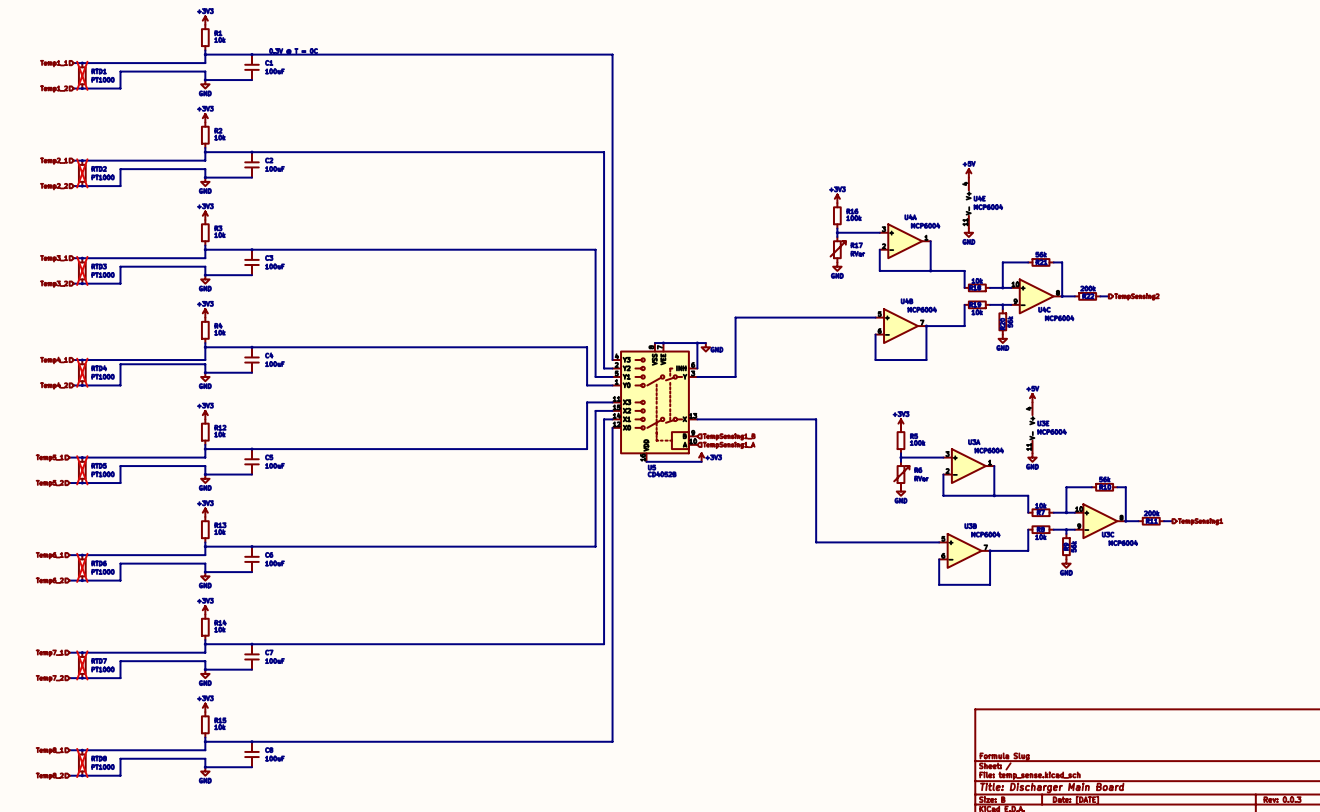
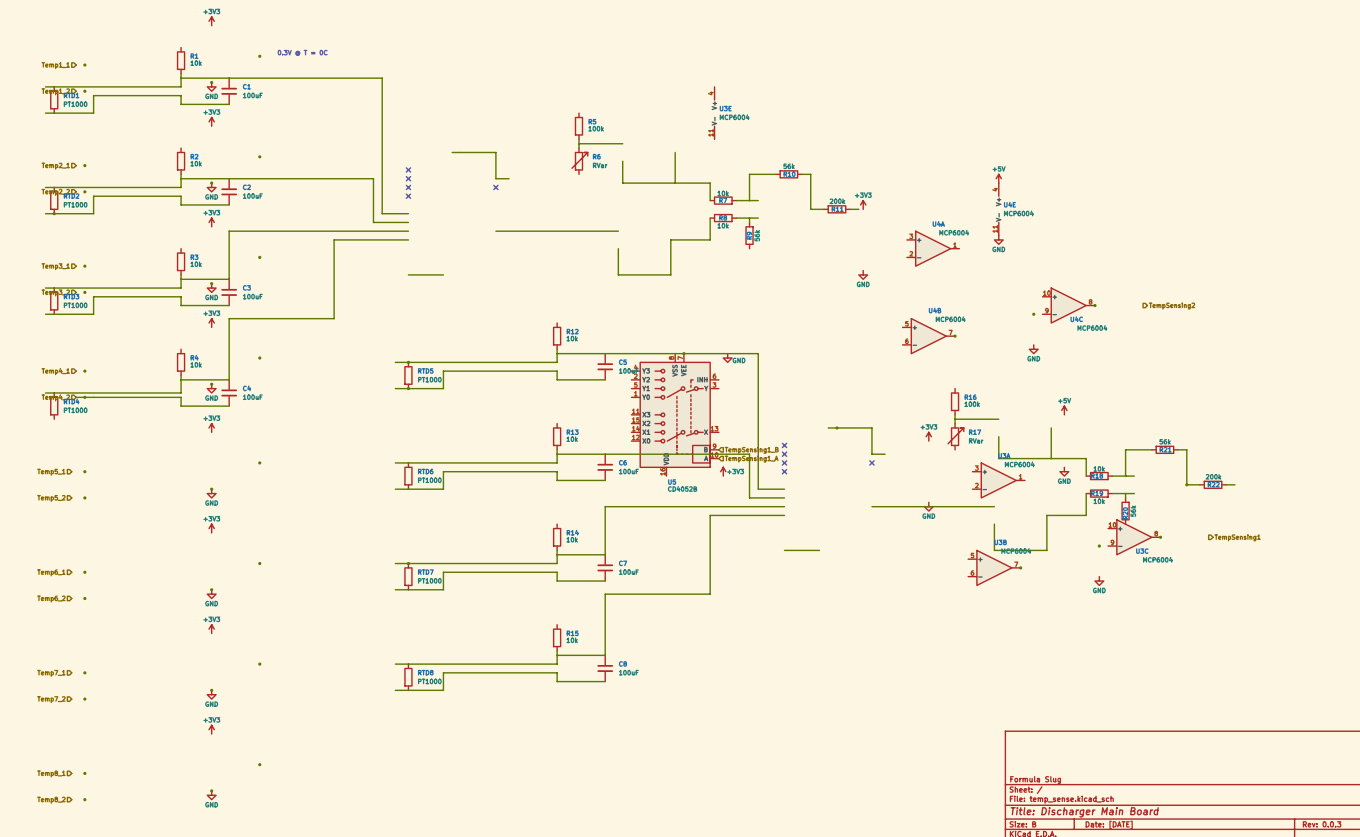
part position: (205, 37) -> (181, 60)
wire: (205, 50) (205, 63) (73, 63) -> (181, 73) (181, 86) (45, 86)
wire: (205, 54) (612, 54) (612, 360) -> none
part position: (251, 67) -> (229, 91)
part position: (82, 75) -> (54, 100)
part do-not-place cross: (82, 75) -> none
wire: none -> (181, 78) (382, 78) (382, 213) (408, 213)
wire: (251, 80) (205, 80) (205, 71) (120, 71) (120, 88) (73, 88) -> (229, 104) (181, 104) (181, 95) (93, 95) (93, 113) (45, 113)
part position: (205, 135) -> (181, 161)
wire: none -> (578, 139) (578, 148)
wire: none -> (578, 143) (622, 143)
wire: (205, 147) (205, 160) (73, 160) -> (181, 174) (181, 187) (45, 187)
wire: none -> (452, 152) (495, 152) (495, 178) (509, 178)
wire: none -> (675, 152) (675, 183)
wire: (205, 152) (604, 152) (604, 156) -> none
part position: (251, 164) -> (229, 191)
no-connect mark: none -> (408, 169)
wire: none -> (775, 174) (749, 174) (749, 200)
wire: none -> (802, 174) (810, 174) (810, 209) (823, 209)
part position: (82, 173) -> (54, 200)
part do-not-place cross: (82, 173) -> none
wire: none -> (181, 178) (373, 178) (373, 222) (408, 222)
no-connect mark: none -> (408, 178)
wire: (251, 177) (205, 177) (205, 169) (120, 169) (120, 186) (73, 186) -> (229, 204) (181, 204) (181, 196) (93, 196) (93, 213) (45, 213)
wire: (604, 177) (604, 368) (612, 368) -> (622, 183) (710, 183) (710, 200)
no-connect mark: none -> (408, 187)
no-connect mark: none -> (495, 187)
no-connect mark: none -> (408, 196)
wire: none -> (736, 200) (758, 200)
wire: none -> (850, 209) (858, 209)
junction: none -> (54, 213)
wire: none -> (710, 218) (710, 239) (670, 239) (670, 274) (618, 274) (618, 248)
wire: none -> (736, 218) (758, 218)
wire: none -> (749, 218) (749, 222)
part position: (837, 215) -> (955, 401)
wire: none -> (408, 231) (229, 231) (229, 279) (181, 279)
wire: none -> (495, 231) (618, 231)
wire: (837, 228) (837, 236) -> none
part position: (205, 232) -> (181, 261)
wire: none -> (408, 239) (334, 239) (334, 318) (229, 318) (229, 379) (181, 379)
wire: (837, 232) (879, 232) -> none
wire: (930, 241) (930, 270) -> none
wire: (205, 245) (205, 258) (73, 258) -> (181, 274) (181, 288) (45, 288)
wire: (205, 249) (595, 249) (595, 376) (612, 376) -> none
part position: (838, 249) -> (955, 436)
wire: (879, 249) (879, 270) (964, 270) (964, 287) -> none
part position: (251, 262) -> (229, 292)
wire: (1028, 262) (1002, 262) (1002, 287) -> none
part position: (1040, 262) -> (1164, 449)
wire: (1053, 262) (1062, 262) (1062, 296) (1074, 296) -> none
wire: none -> (408, 274) (443, 274)
part position: (82, 270) -> (54, 301)
part do-not-place cross: (82, 270) -> none
wire: (251, 275) (205, 275) (205, 266) (120, 266) (120, 283) (73, 283) -> (229, 305) (181, 305) (181, 296) (93, 296) (93, 314) (45, 314)
part position: (977, 287) -> (1099, 476)
wire: (990, 287) (1011, 287) -> none
part position: (1087, 296) -> (1213, 484)
wire: (1100, 296) (1108, 296) -> none
wire: (964, 304) (964, 326) (926, 326) (926, 360) (875, 360) (875, 334) -> none
part position: (977, 304) -> (1099, 493)
wire: (990, 304) (1011, 304) -> none
wire: (1002, 304) (1002, 309) -> none
wire: (875, 317) (735, 317) (735, 343) -> (727, 353) (758, 353)
part position: (1002, 321) -> (1125, 511)
part position: (205, 330) -> (181, 362)
wire: none -> (557, 349) (557, 362) (395, 362)
wire: (205, 343) (205, 360) (73, 360) -> (181, 375) (181, 392) (45, 392)
wire: none -> (557, 353) (675, 353)
wire: (697, 343) (697, 368) -> none
wire: (205, 347) (587, 347) (587, 385) (612, 385) -> none
junction: none -> (408, 362)
part position: (251, 360) -> (229, 392)
wire: none -> (605, 379) (557, 379) (557, 371) (443, 371) (443, 388) (395, 388)
part position: (82, 372) -> (54, 406)
part do-not-place cross: (82, 372) -> none
wire: (251, 372) (205, 372) (205, 364) (120, 364) (120, 385) -> (229, 406) (181, 406) (181, 397) (124, 397)
junction: none -> (408, 388)
wire: (697, 376) (735, 376) -> (784, 489) (758, 489) (758, 388)
wire: (612, 402) (587, 402) (587, 449) (540, 449) -> (557, 449) (557, 462)
wire: (612, 410) (595, 410) (595, 546) (540, 546) -> (557, 550) (557, 563)
wire: none -> (828, 427) (871, 427) (871, 454) (885, 454)
wire: (612, 419) (604, 419) (604, 644) (540, 644) -> (557, 650) (557, 664)
wire: (697, 419) (816, 419) (816, 542) (939, 542) -> none
wire: (612, 427) (612, 741) (205, 741) -> none
part position: (1032, 427) -> (714, 113)
part position: (205, 432) -> (557, 336)
no-connect mark: none -> (784, 445)
wire: none -> (557, 454) (749, 454) (749, 497) (784, 497)
no-connect mark: none -> (784, 454)
part position: (900, 440) -> (578, 126)
wire: (205, 444) (205, 457) (69, 457) -> none
wire: (205, 449) (383, 449) -> none
no-connect mark: none -> (784, 462)
no-connect mark: none -> (871, 462)
wire: (900, 453) (900, 461) -> (955, 414) (955, 423)
no-connect mark: none -> (784, 471)
wire: (900, 457) (943, 457) -> (955, 419) (998, 419)
part position: (251, 461) -> (605, 366)
wire: (646, 461) (701, 461) -> none
wire: none -> (605, 480) (557, 480) (557, 471) (443, 471) (443, 489) (395, 489)
wire: (994, 466) (994, 495) -> (1051, 427) (1051, 458)
part position: (82, 470) -> (408, 375)
part do-not-place cross: (82, 470) -> none
junction: none -> (1186, 484)
wire: (251, 474) (205, 474) (205, 466) (120, 466) (120, 483) (69, 483) -> none
part position: (901, 474) -> (579, 161)
wire: (943, 474) (943, 495) (1028, 495) (1028, 512) -> (998, 436) (998, 458) (1086, 458) (1086, 476)
wire: (1091, 487) (1066, 487) (1066, 512) -> (1151, 449) (1125, 449) (1125, 476)
part position: (1104, 487) -> (788, 174)
wire: (1117, 487) (1125, 487) (1125, 521) (1138, 521) -> (1178, 449) (1186, 449) (1186, 484) (1199, 484)
wire: none -> (784, 506) (605, 506) (605, 554) (557, 554)
wire: none -> (871, 506) (994, 506)
wire: none -> (784, 515) (710, 515) (710, 594) (605, 594) (605, 655) (557, 655)
part position: (1040, 512) -> (723, 200)
wire: (1053, 512) (1074, 512) -> (1112, 476) (1134, 476)
part position: (1151, 521) -> (836, 209)
wire: (1163, 521) (1172, 521) -> (1226, 484) (1234, 484)
part position: (205, 529) -> (557, 436)
wire: (1028, 529) (1028, 550) (990, 550) (990, 584) (939, 584) (939, 559) -> (1086, 493) (1086, 515) (1046, 515) (1046, 550) (994, 550) (994, 524)
part position: (1040, 529) -> (723, 218)
wire: (1053, 529) (1074, 529) -> (1112, 493) (1134, 493)
wire: (1066, 529) (1066, 533) -> (1125, 493) (1125, 497)
wire: none -> (784, 550) (819, 550)
wire: (205, 542) (205, 555) (69, 555) -> none
wire: (205, 546) (383, 546) -> none
junction: none -> (408, 563)
part position: (1066, 546) -> (749, 235)
part position: (251, 559) -> (605, 467)
wire: none -> (605, 581) (557, 581) (557, 572) (443, 572) (443, 589) (395, 589)
part position: (82, 567) -> (408, 476)
part do-not-place cross: (82, 567) -> none
wire: (251, 572) (205, 572) (205, 563) (120, 563) (120, 580) (69, 580) -> none
part position: (205, 627) -> (557, 537)
wire: (205, 639) (205, 652) (69, 652) -> none
wire: (205, 644) (383, 644) -> none
part position: (251, 656) -> (605, 567)
wire: none -> (605, 681) (557, 681) (557, 672) (443, 672) (443, 690) (395, 690)
part position: (82, 665) -> (408, 576)
part do-not-place cross: (82, 665) -> none
wire: (251, 669) (205, 669) (205, 661) (120, 661) (120, 678) (69, 678) -> none
part position: (205, 724) -> (557, 637)
wire: (205, 737) (205, 750) (69, 750) -> none
part position: (251, 754) -> (605, 668)
part position: (82, 762) -> (408, 677)
part do-not-place cross: (82, 762) -> none
wire: (251, 767) (205, 767) (205, 758) (120, 758) (120, 775) (69, 775) -> none

